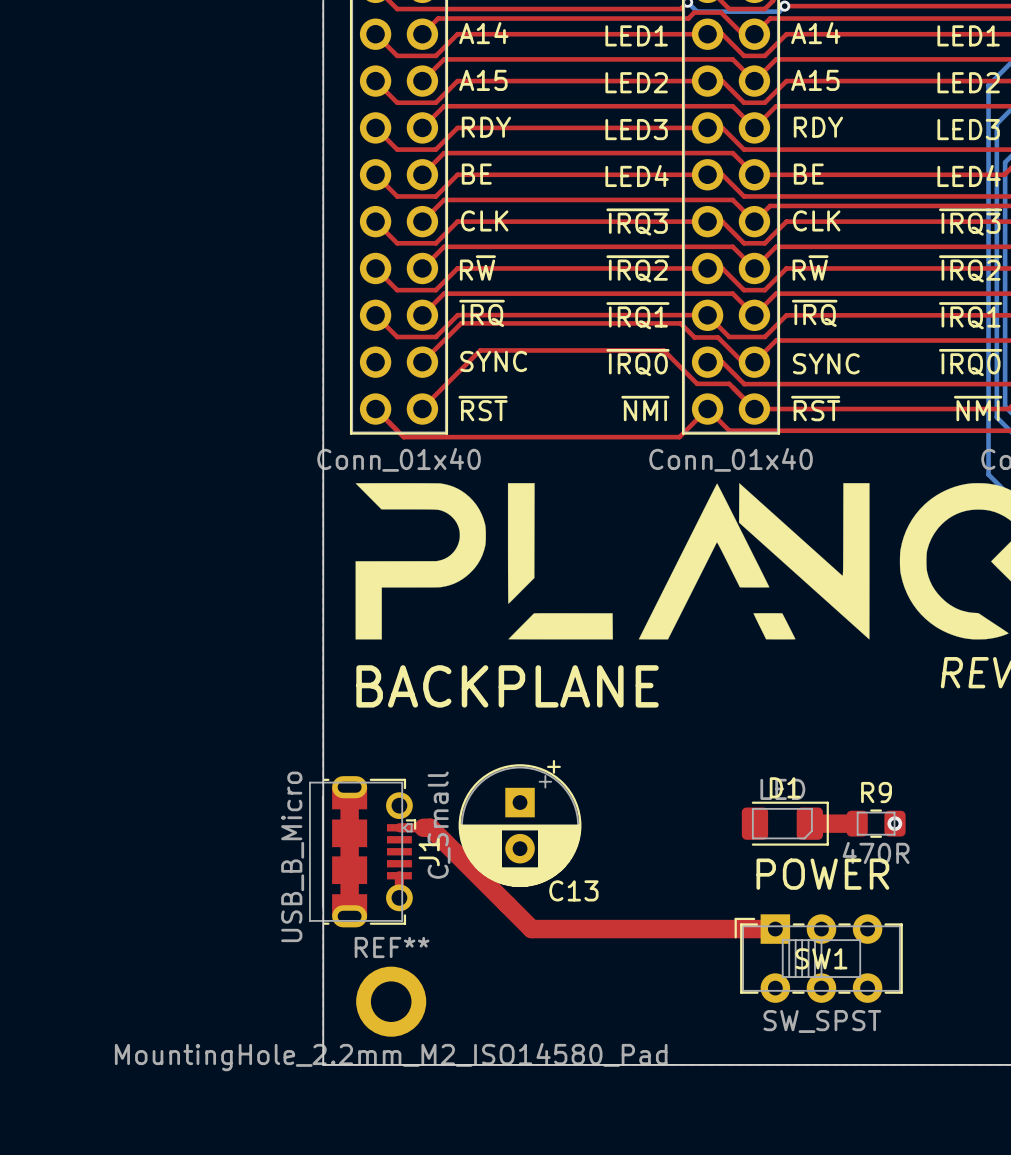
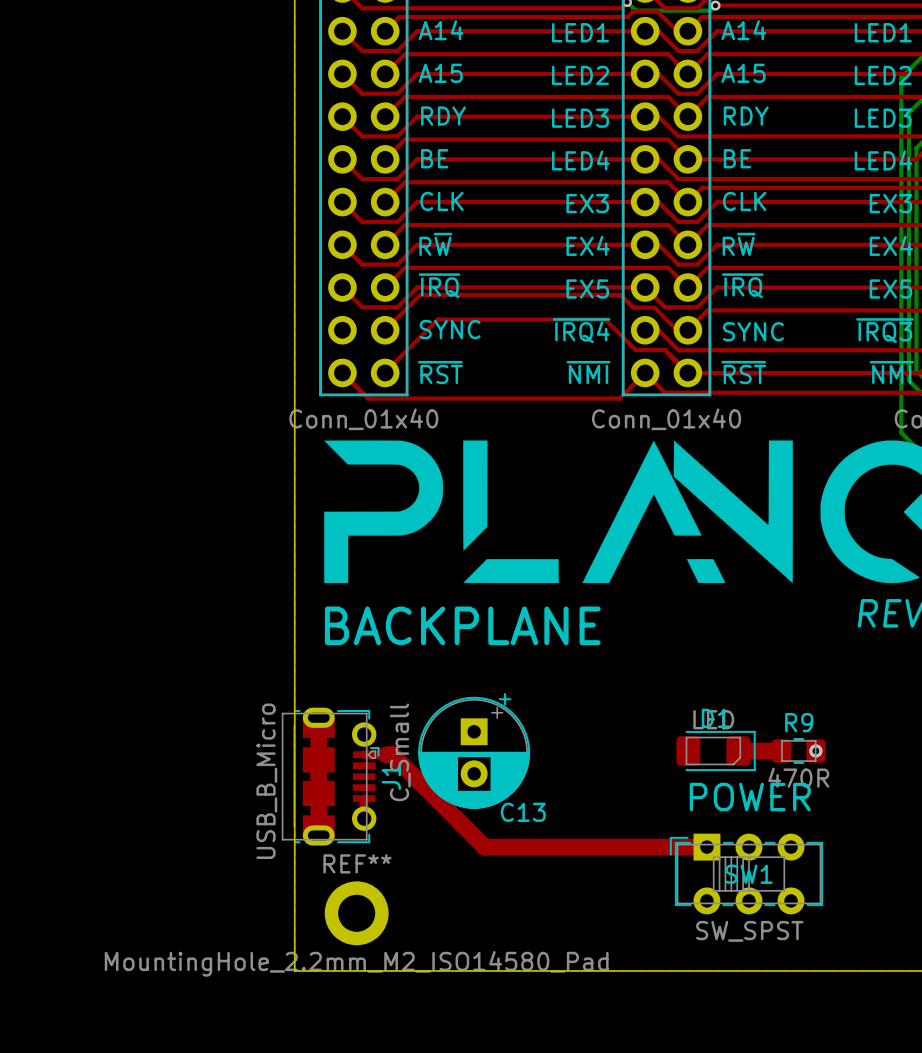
text: ~{IRQ3} (637, 222) -> EX3 (587, 203)
text: ~{IRQ3} (970, 222) -> EX3 (890, 203)
text: ~{IRQ2} (637, 268) -> EX4 (588, 245)
text: ~{IRQ2} (970, 268) -> EX4 (891, 245)
text: ~{IRQ1} (637, 315) -> EX5 (587, 289)
text: ~{IRQ1} (970, 315) -> EX5 (890, 289)
text: ~{IRQ0} (637, 362) -> ~{IRQ4} (581, 330)
text: ~{IRQ0} (970, 362) -> ~{IRQ3} (884, 330)

